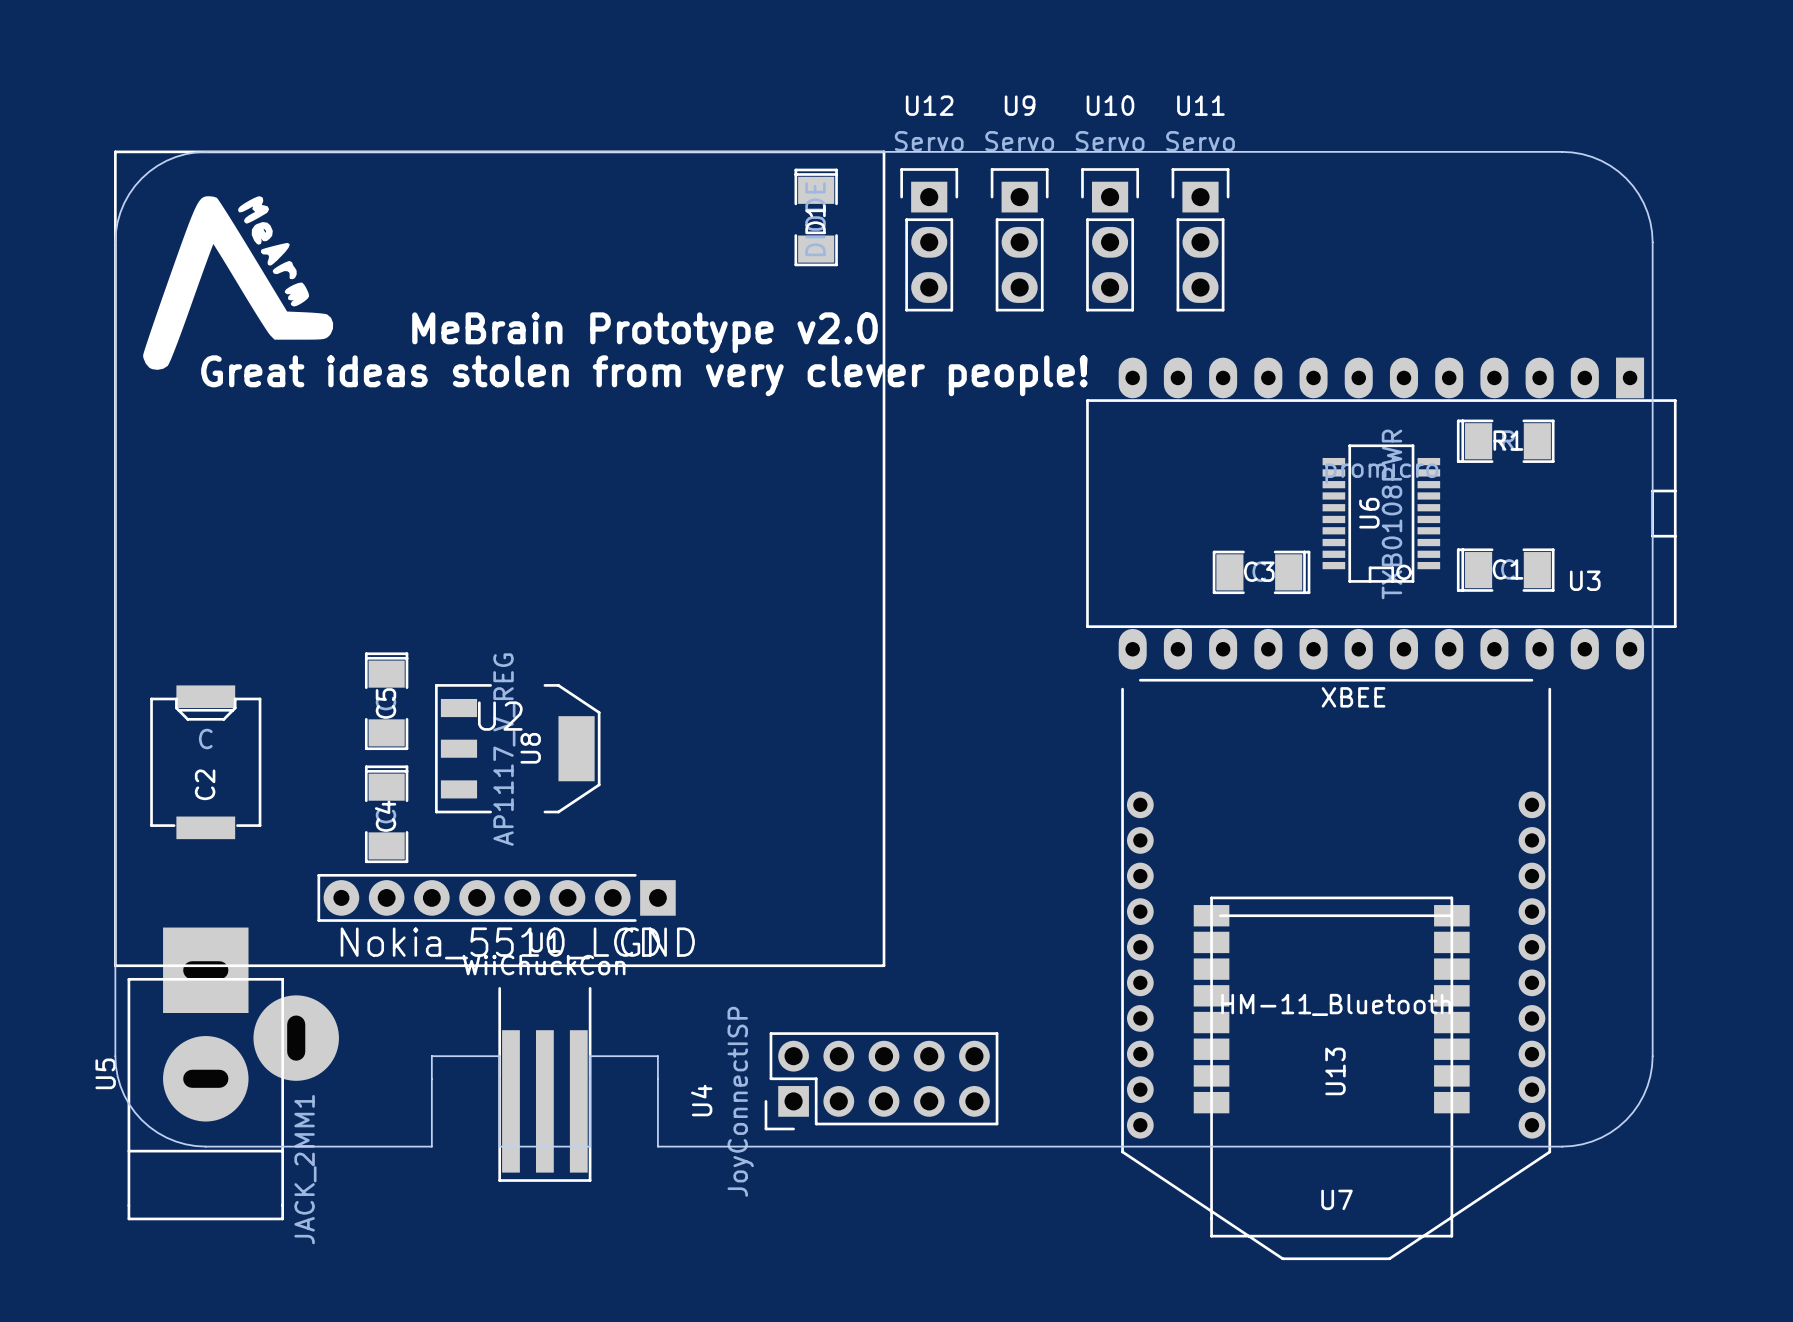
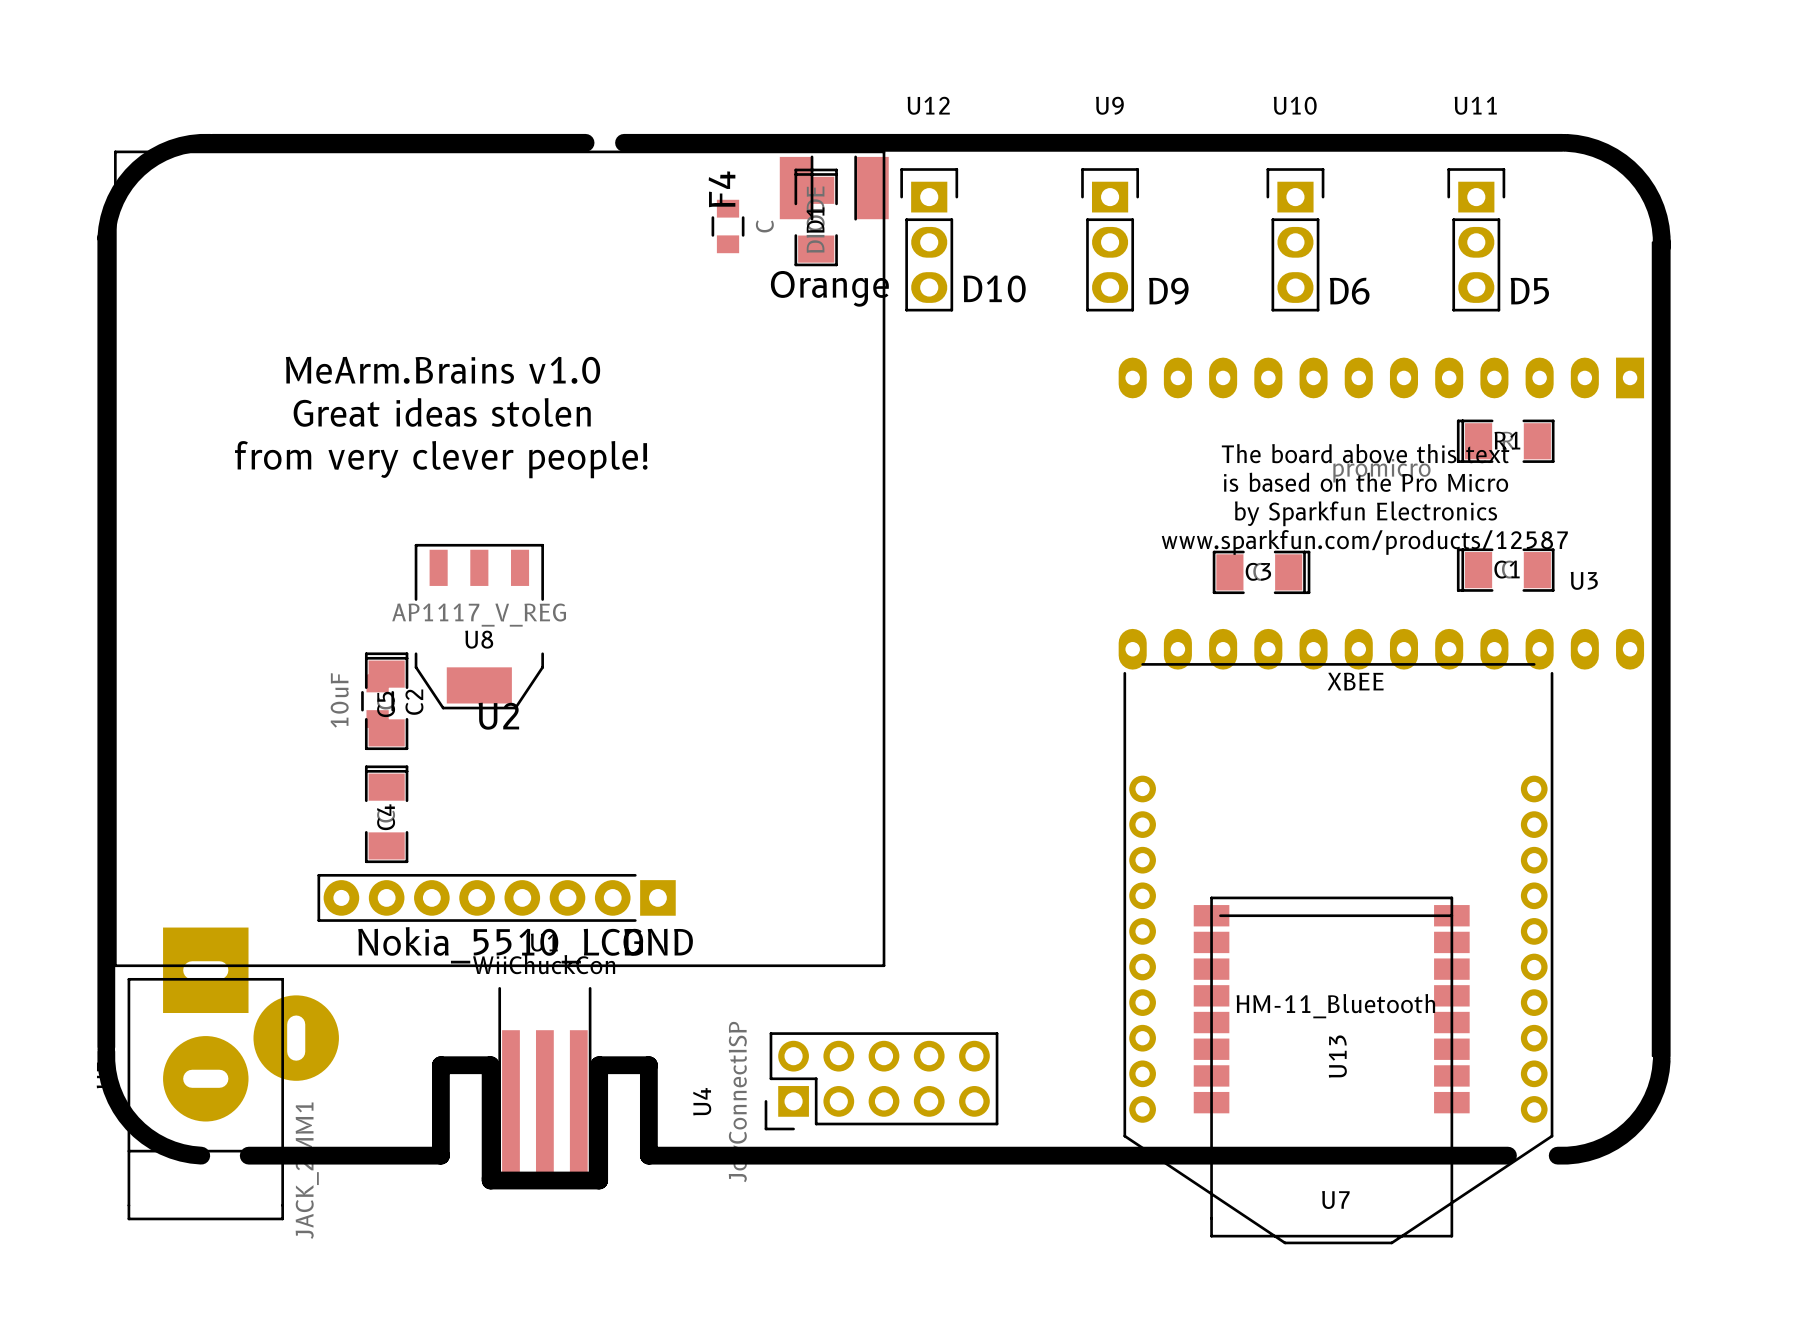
U10 name: U10 (1110, 105) -> U9 (1109, 105)
U12 value: Servo (929, 141) -> none
U10 value: Servo (1110, 141) -> none
U11 value: Servo (1200, 141) -> none
board edge: none -> (210, 142) (190, 143) (171, 148) (146, 162) (131, 175) (120, 191) (111, 209) (107, 228) (106, 1047)
board edge: none -> (212, 142) (585, 142)
board edge: none -> (624, 142) (1562, 142)
board edge: none -> (1566, 142) (1586, 145) (1604, 152) (1621, 162) (1635, 175) (1647, 190) (1655, 208) (1660, 227) (1661, 246)
F4: none -> (834, 188)
drawing: [143, 196, 334, 370] -> none
part: none -> C (728, 226)
U9: Servo (1019, 239) -> none
U11 position: (1200, 239) -> (1476, 239)
U10: none -> (1295, 239)
board edge: (1652, 242) (1650, 222) (1643, 203) (1626, 178) (1610, 165) (1592, 156) (1562, 151) (195, 152) (175, 156) (157, 165) (135, 185) (120, 212) (115, 242) (115, 1066) (120, 1086) (135, 1112) (149, 1126) (166, 1137) (185, 1144) (205, 1146) (431, 1146) (431, 1056) (499, 1056) (499, 1146) (590, 1146) (590, 1056) (657, 1056) (657, 1146) (1562, 1146) (1582, 1144) (1601, 1137) (1626, 1120) (1638, 1104) (1647, 1086) (1652, 1056) -> none
board edge: none -> (1661, 242) (1661, 1056)
text: none -> Orange (829, 288)
text: none -> D10 (994, 288)
text: none -> D9 (1168, 291)
text: none -> D6 (1349, 291)
text: none -> D5 (1529, 291)
text: MeBrain Prototype v2.0 (645, 332) -> none
U3 footprint: [1086, 357, 1677, 670] -> [1118, 357, 1645, 670]
text: none -> MeArm.Brains v1.0 (443, 370)
text: Great ideas stolen from very clever people! (644, 375) -> none
text: none -> Great ideas stolen (442, 412)
text: none -> The board above this text (1365, 453)
text: none -> from very clever people! (441, 459)
text: none -> is based on the Pro Micro (1366, 482)
U6: TXB0108PWR (1381, 513) -> none
text: none -> by Sparkfun Electronics (1366, 513)
text: none -> www.sparkfun.com/products/12587 (1364, 542)
C2 footprint: [150, 685, 262, 840] -> [361, 674, 395, 728]
C2 value: C (205, 739) -> 10uF (339, 700)
U8 rotation: 0° (517, 748) -> 90° clockwise (479, 626)
U8 position: (517, 748) -> (479, 626)
C2 name position: C2 (205, 784) -> C2 (414, 702)
U13 position: (1336, 969) -> (1338, 953)
board edge: none -> (106, 1051) (107, 1071) (112, 1090) (120, 1107) (132, 1123) (146, 1136) (163, 1146) (181, 1152) (201, 1155)
board edge: none -> (1661, 1060) (1658, 1080) (1652, 1098) (1642, 1115) (1629, 1129) (1613, 1141) (1596, 1149) (1577, 1154) (1557, 1155)
board edge: none -> (248, 1155) (440, 1155) (440, 1065) (490, 1065) (490, 1180) (599, 1180) (599, 1065) (648, 1065) (648, 1155) (1507, 1155)

